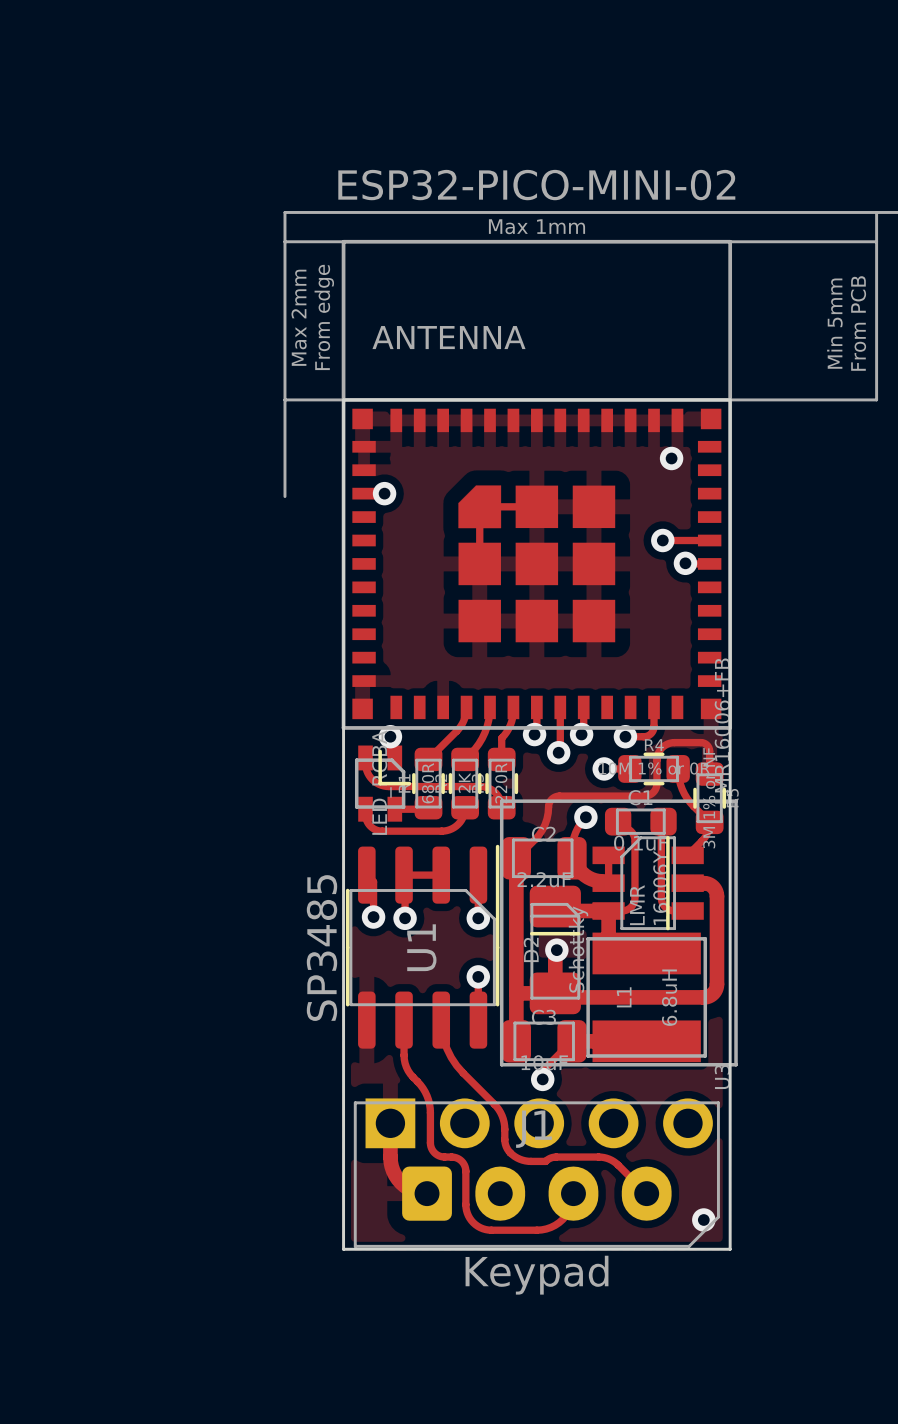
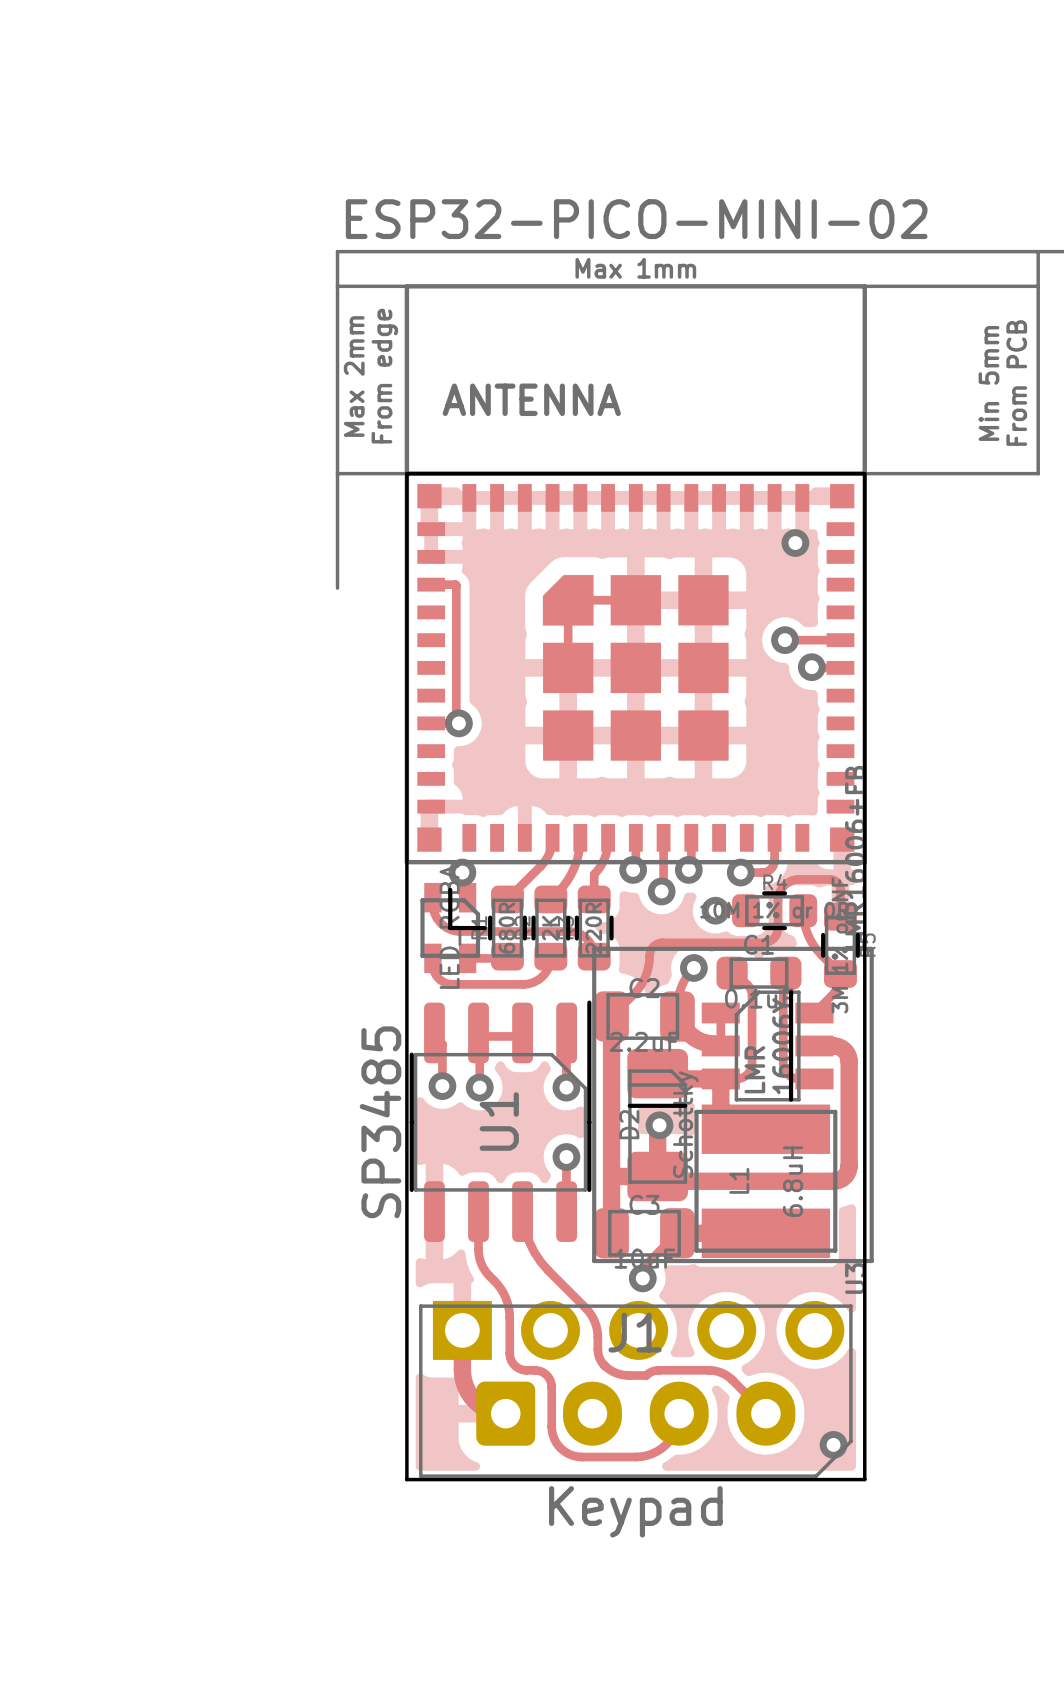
track: none -> (455, 584) (456, 721) (454, 723) (431, 723)
via position: (384, 493) -> (458, 723)
U1 footprint: [345, 844, 500, 1049] -> [409, 1000, 592, 1242]

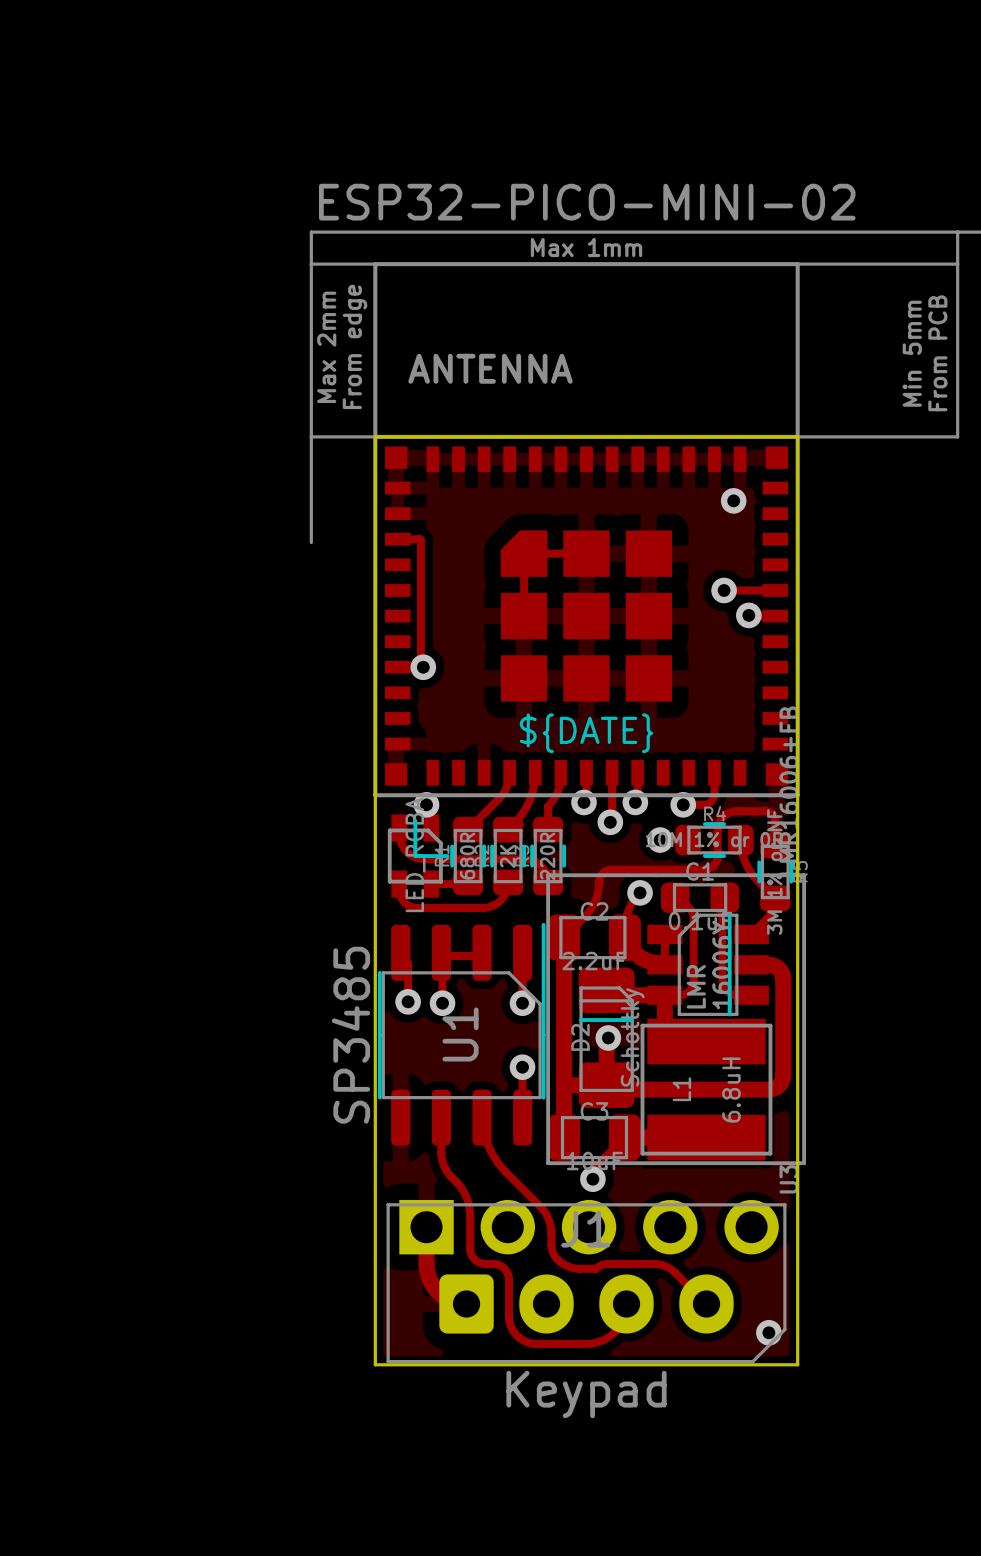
text: none -> ${DATE} (586, 733)

